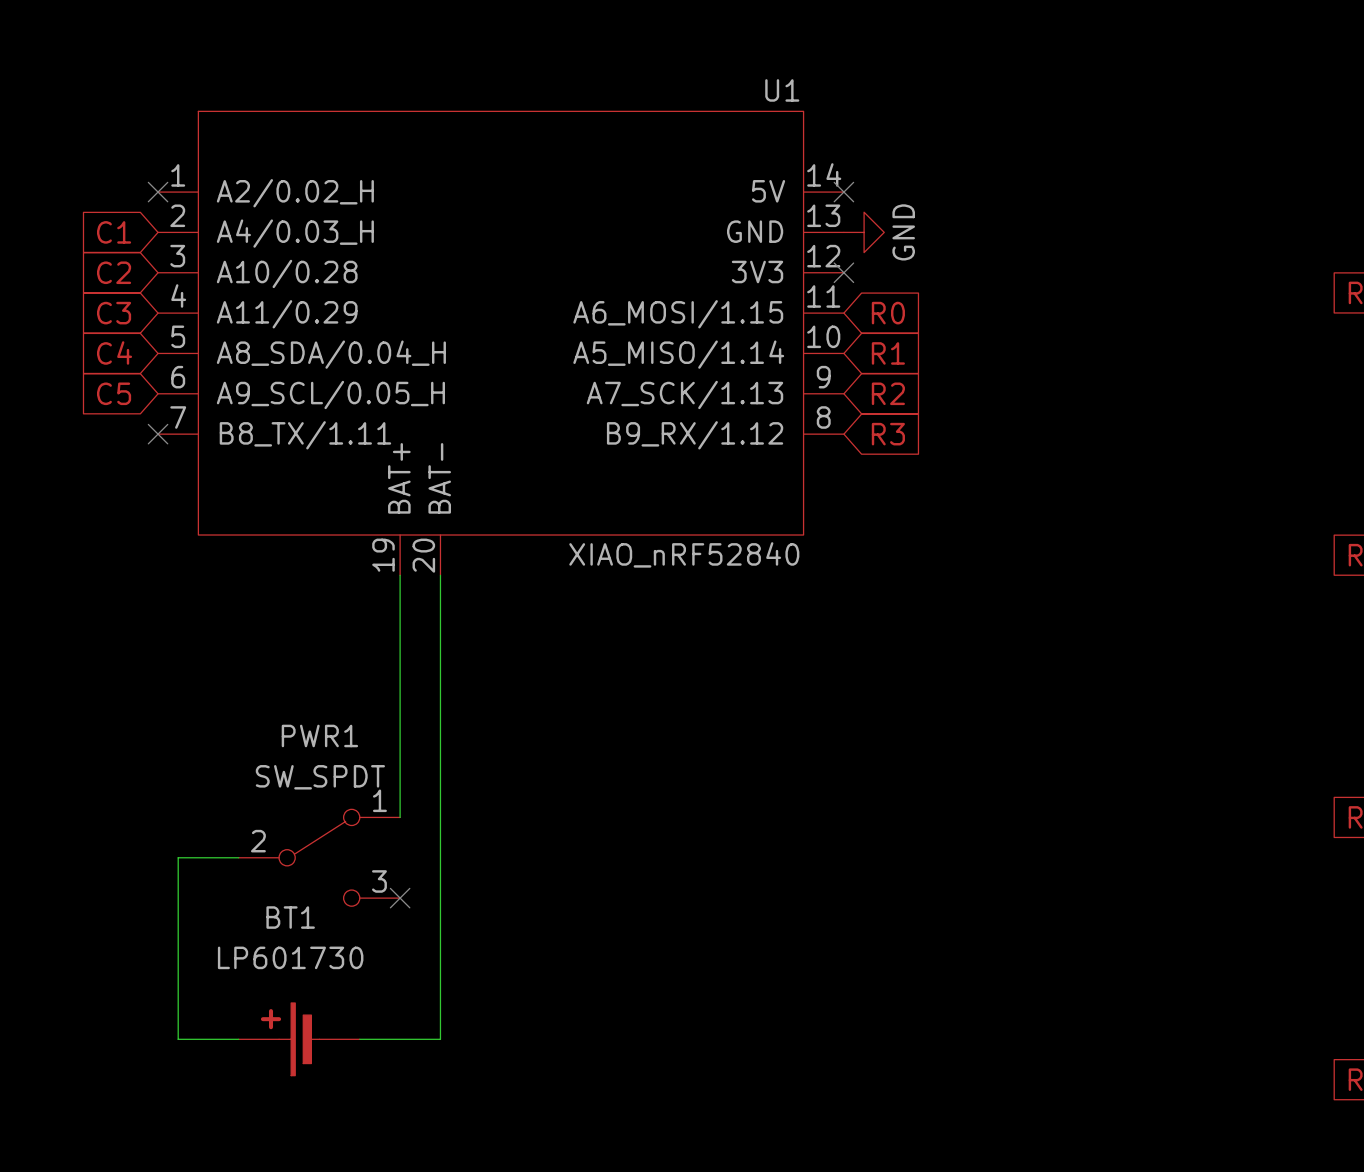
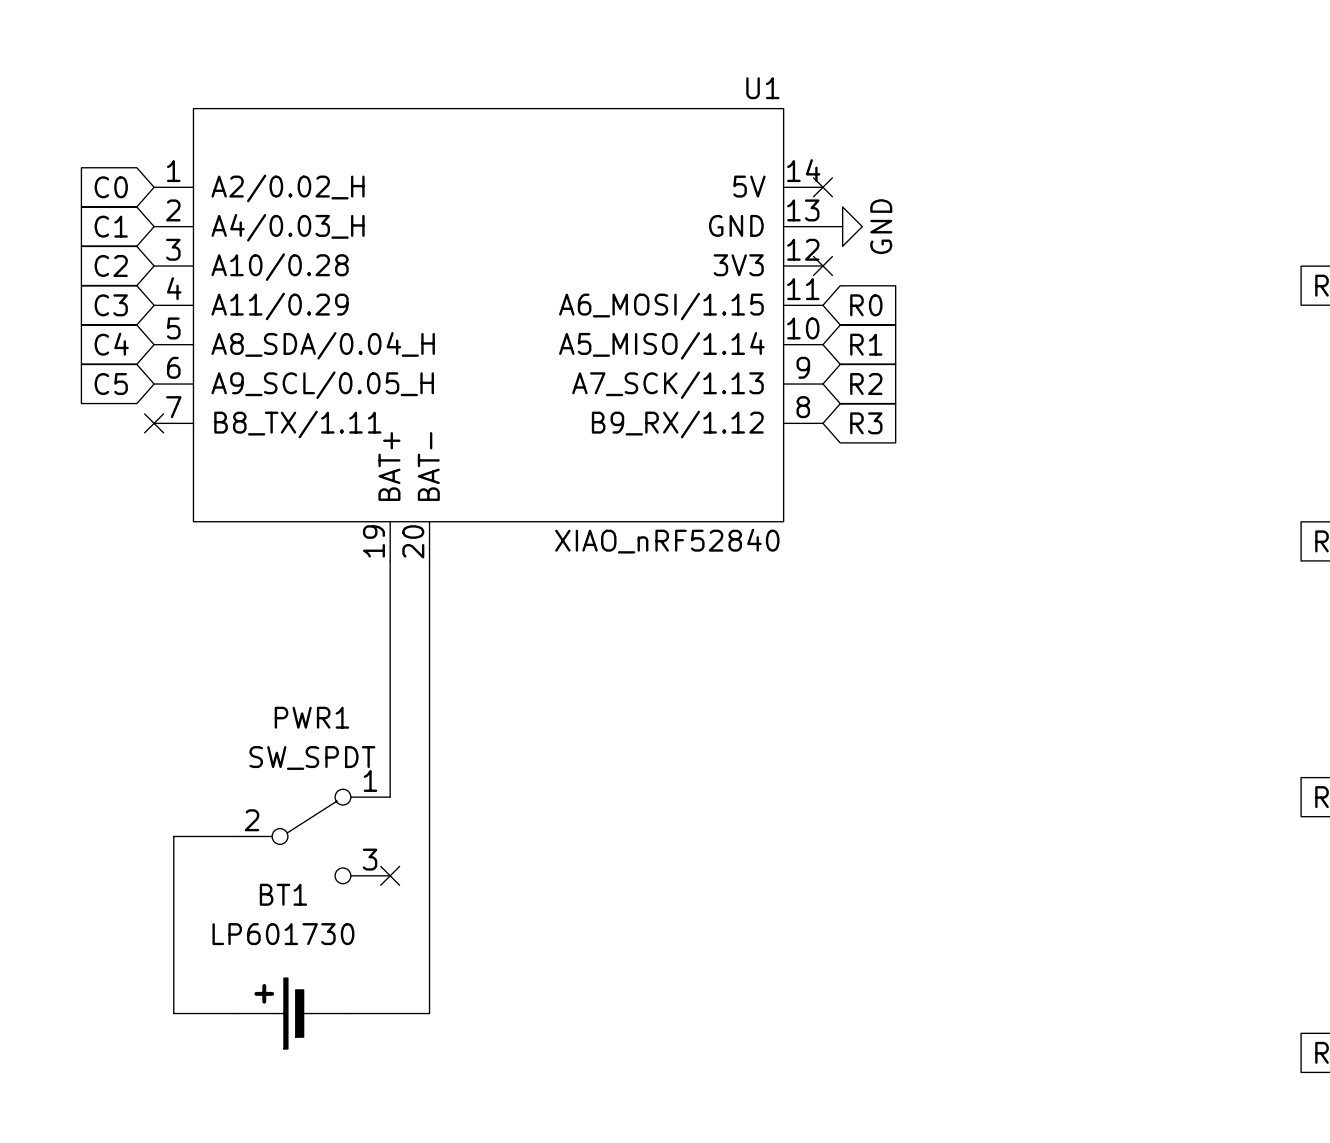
global label: none -> C0 (111, 187)
no-connect mark: (158, 192) -> none

